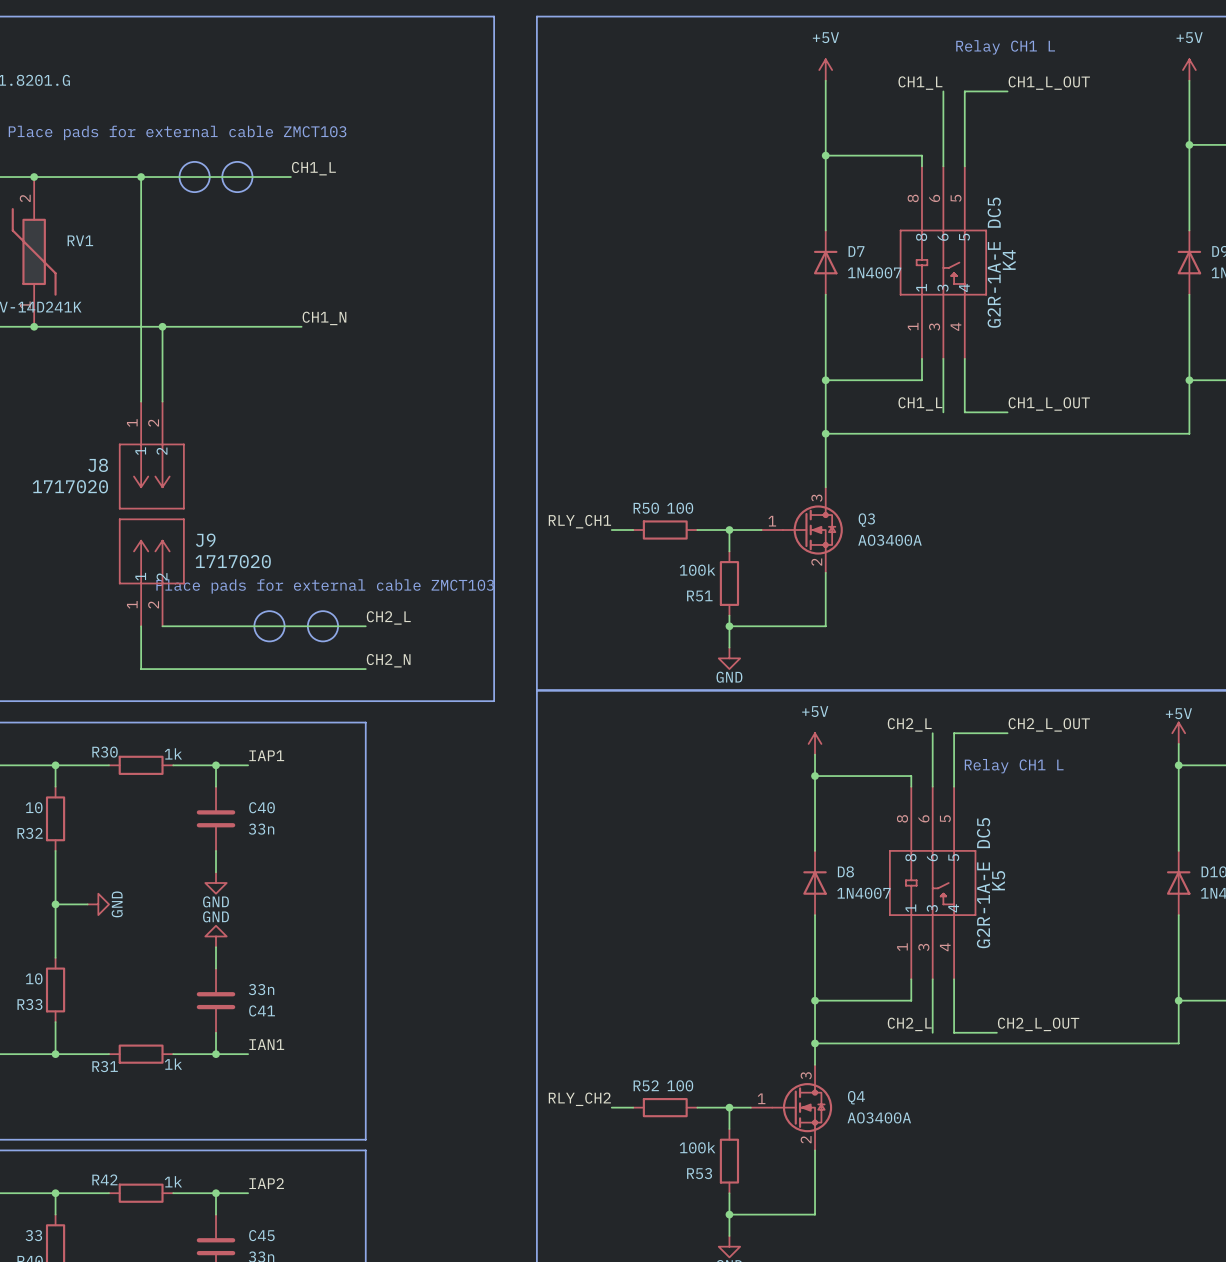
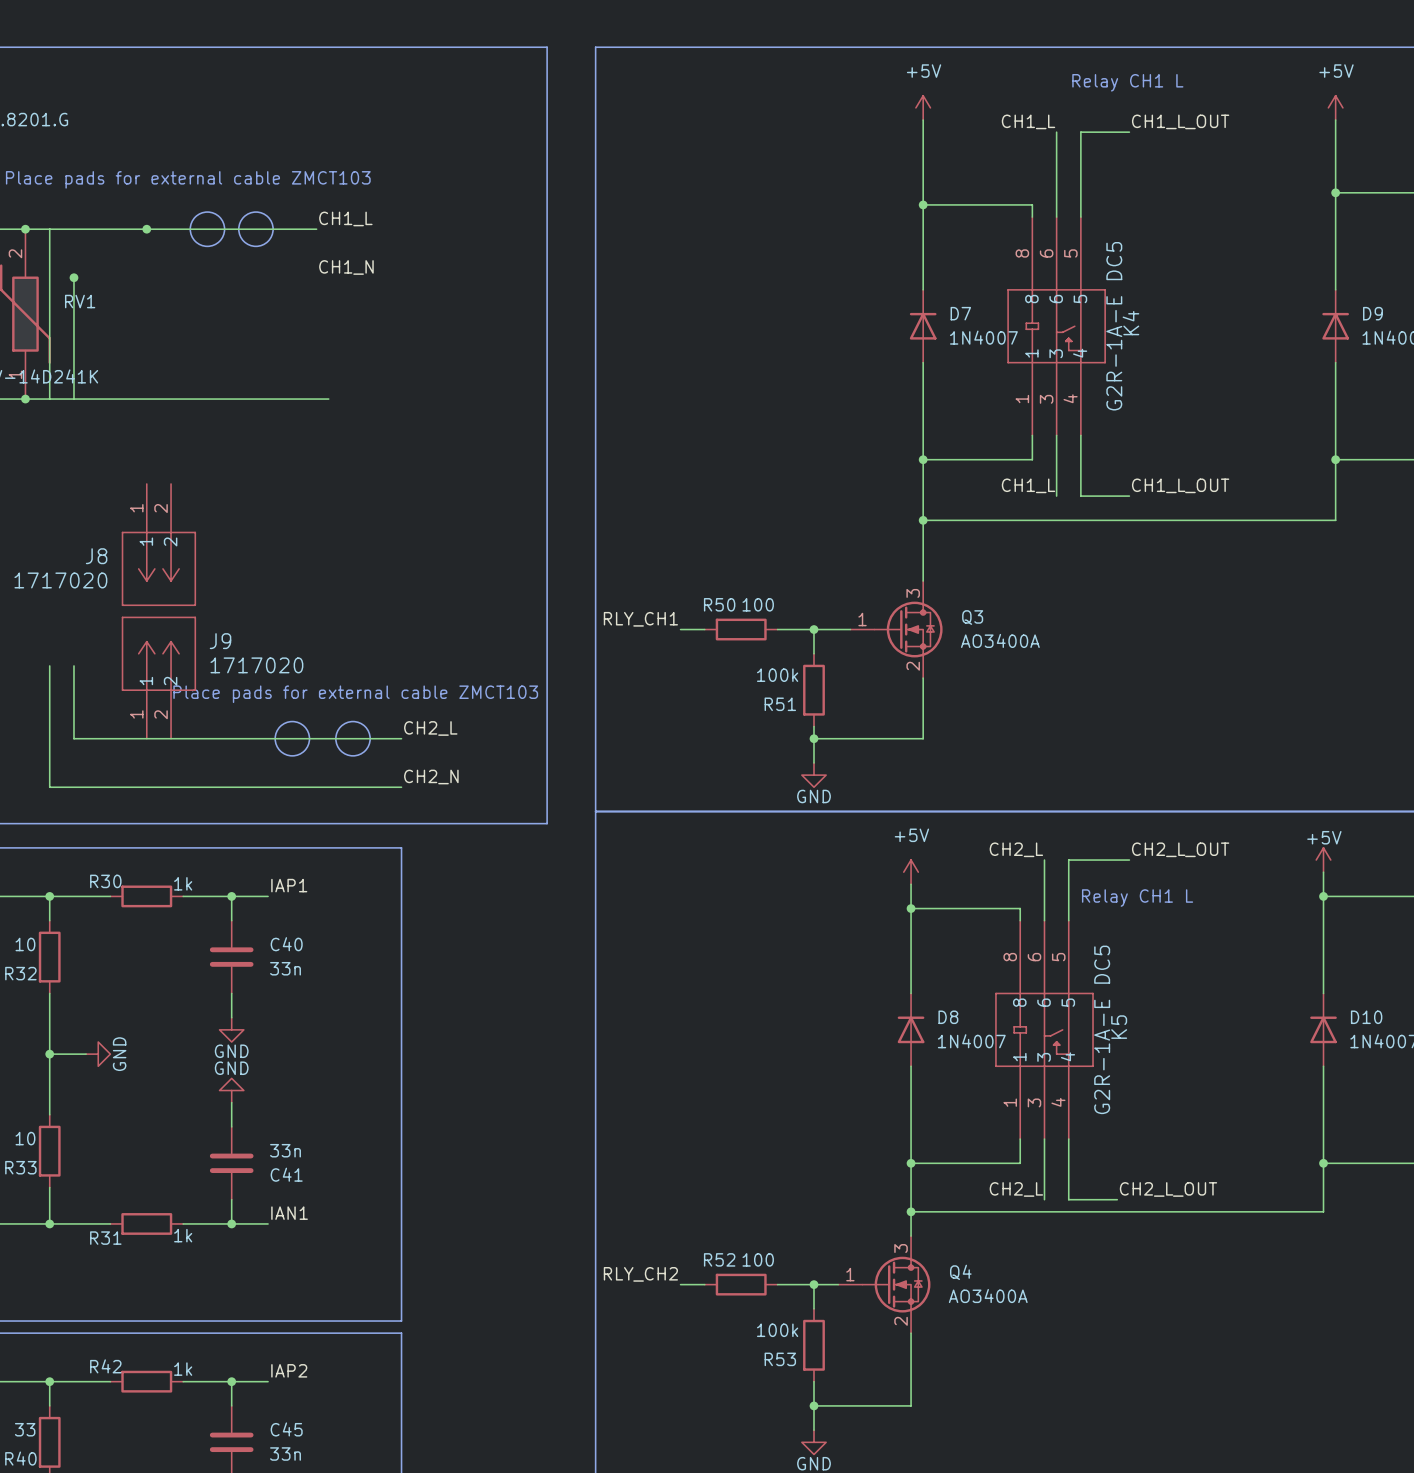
wire: none -> (49, 229) (49, 399)
wire: (141, 177) (141, 401) -> none
wire: none -> (73, 277) (73, 399)
junction: none -> (73, 277)
label position: CH1_N (324, 318) -> CH1_N (346, 267)
wire: (162, 326) (162, 401) -> none
junction: (162, 326) -> none
wire: none -> (73, 665) (73, 738) (171, 738)
wire: (141, 626) (141, 669) -> (49, 665) (49, 787) (146, 787)

